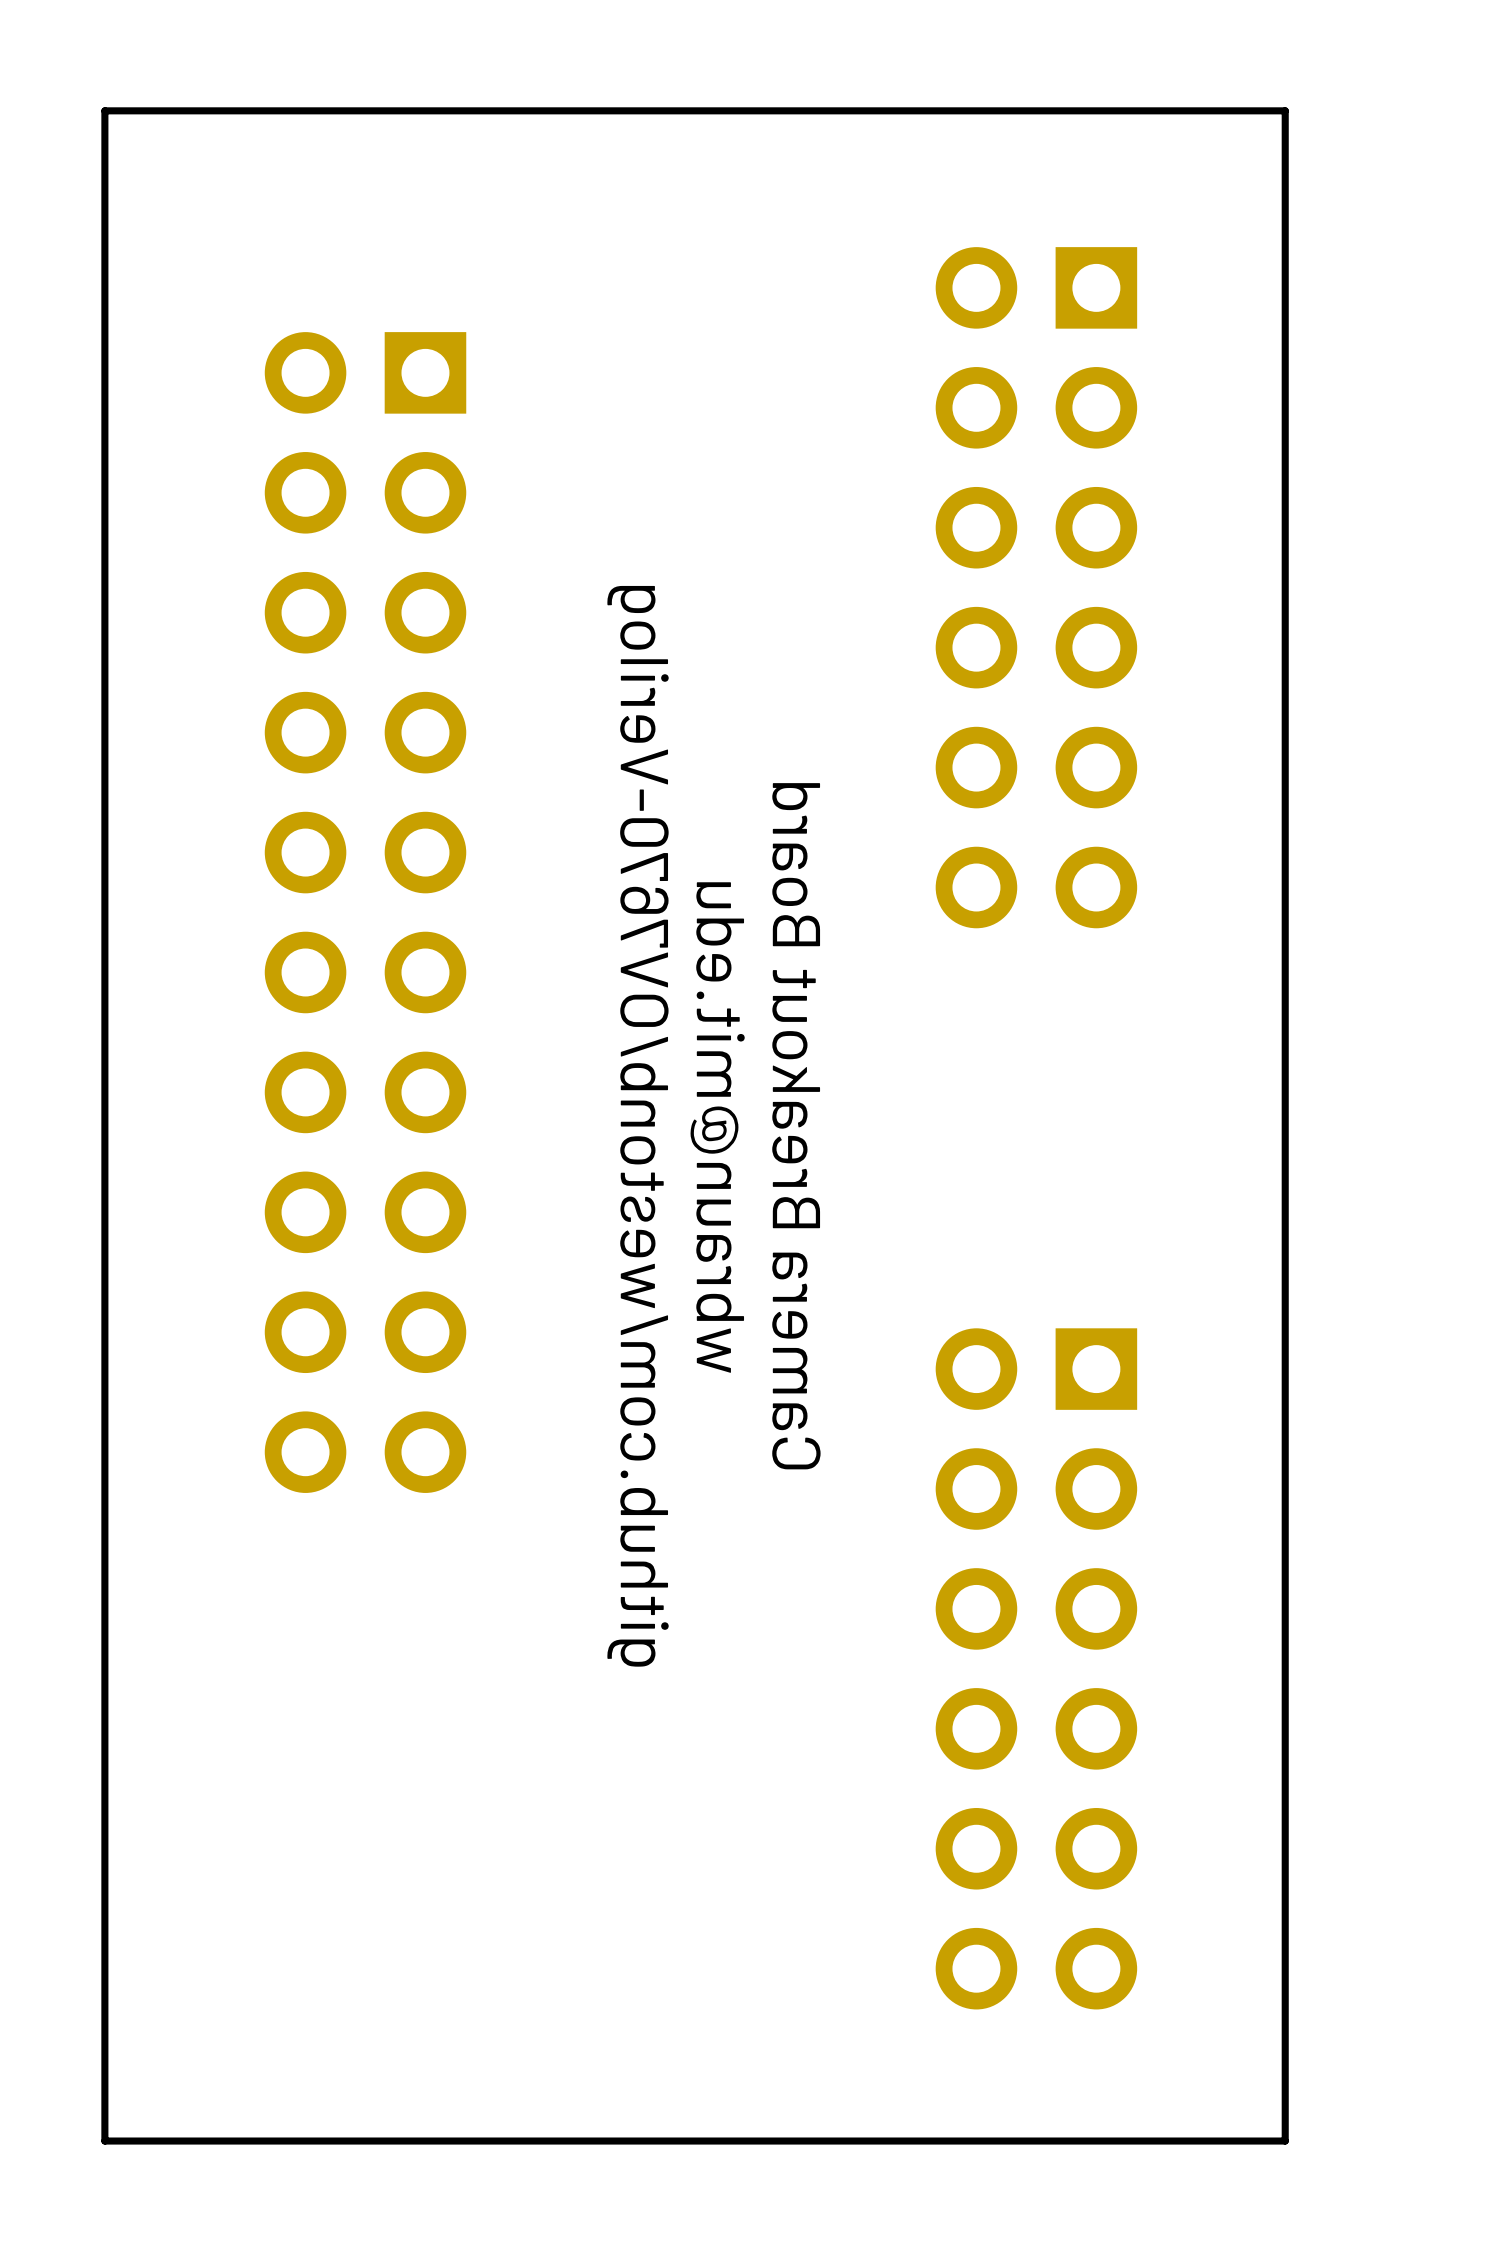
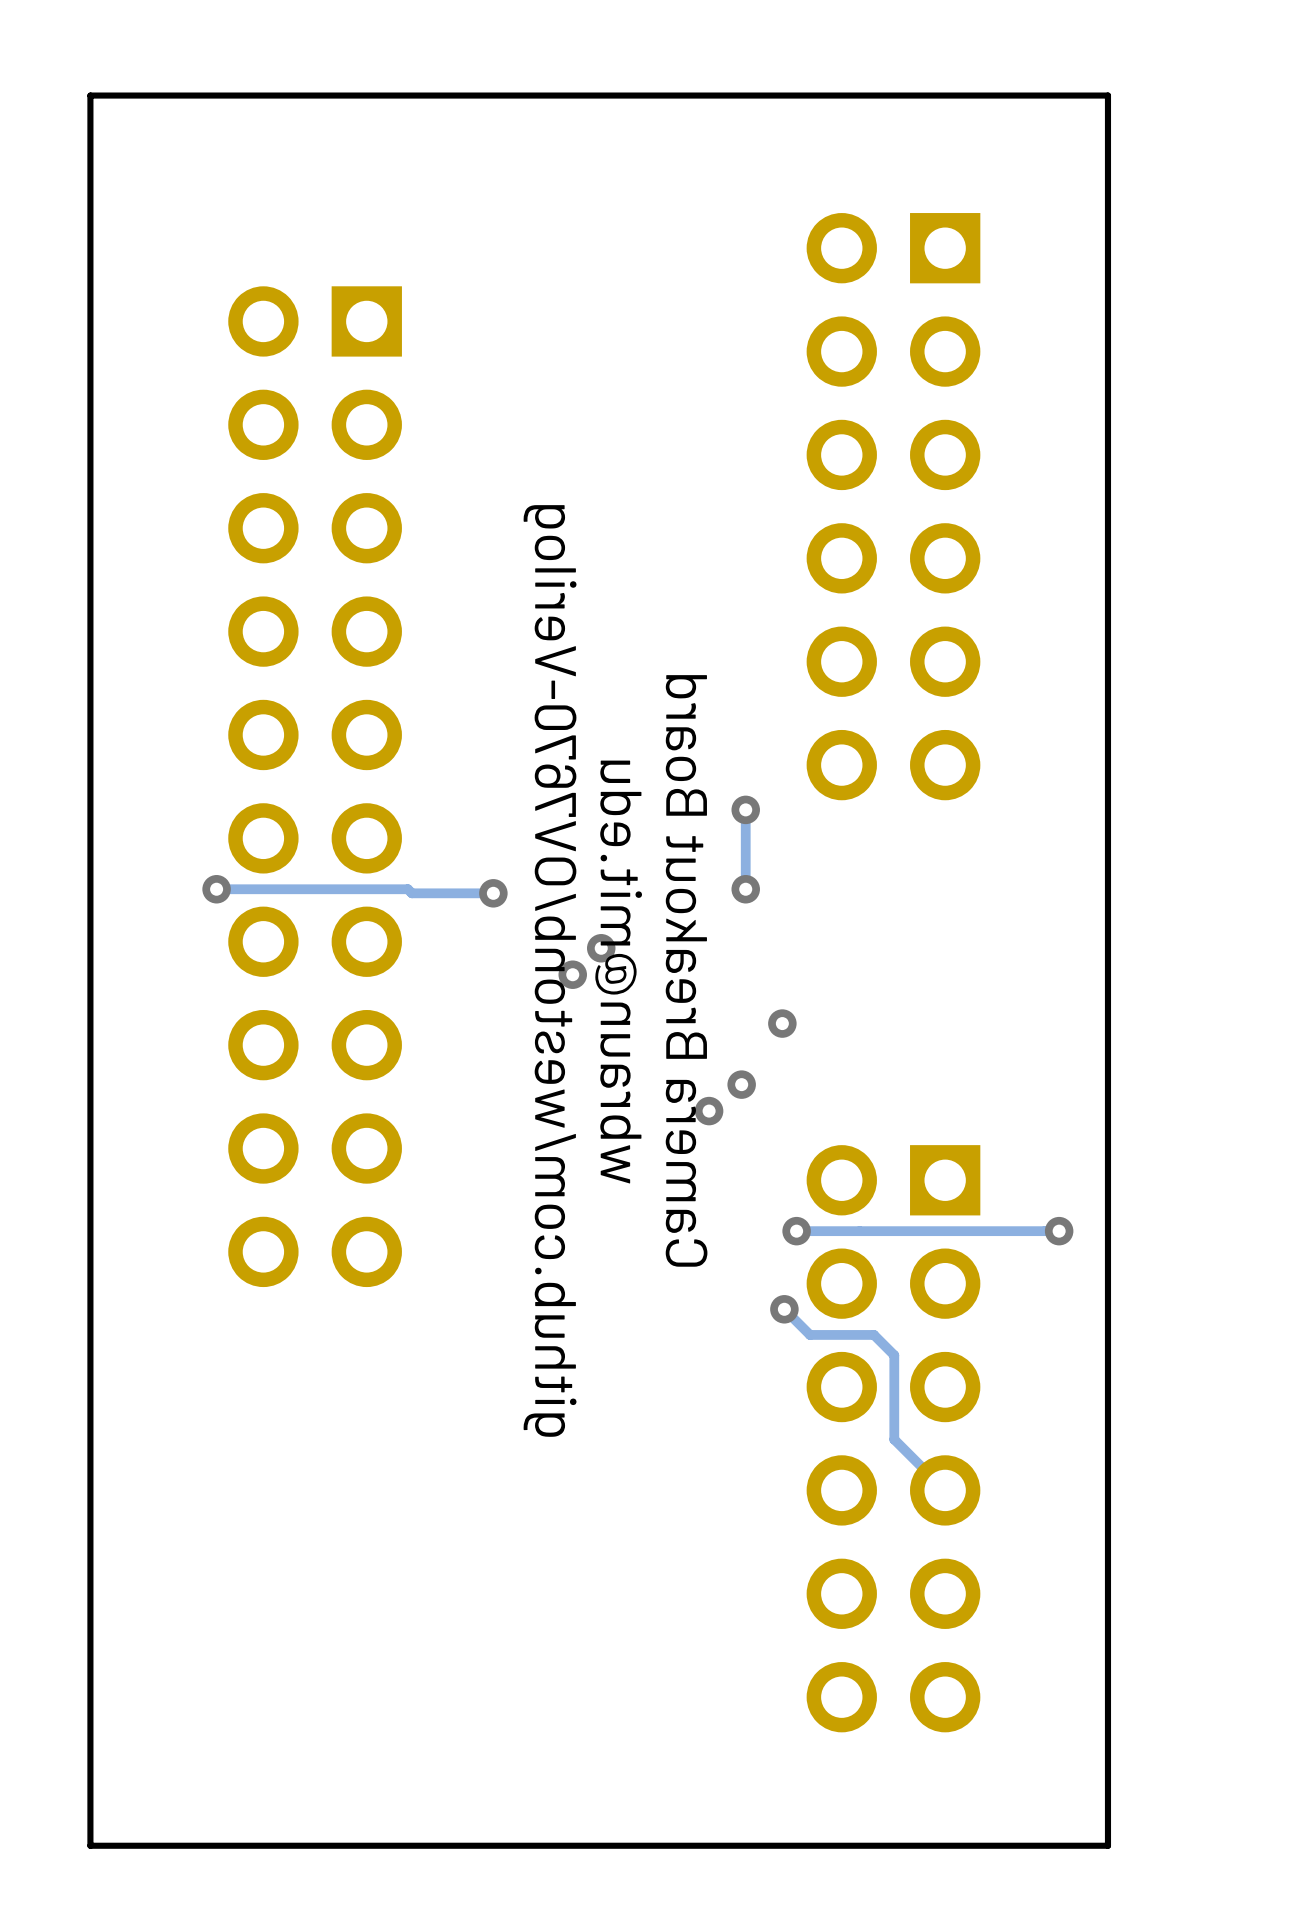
track: none -> (745, 809) (745, 889)
via: none -> (745, 809)
track: none -> (216, 889) (407, 889) (411, 893) (493, 893)
via: none -> (216, 889)
via: none -> (745, 889)
via: none -> (493, 893)
via: none -> (601, 948)
via: none -> (572, 974)
via: none -> (782, 1023)
via: none -> (741, 1084)
via: none -> (709, 1111)
via: none -> (796, 1231)
track: none -> (1059, 1231) (796, 1231)
via: none -> (1059, 1231)
track: none -> (784, 1309) (810, 1334) (873, 1334) (894, 1355) (894, 1439) (945, 1490)
via: none -> (784, 1309)

